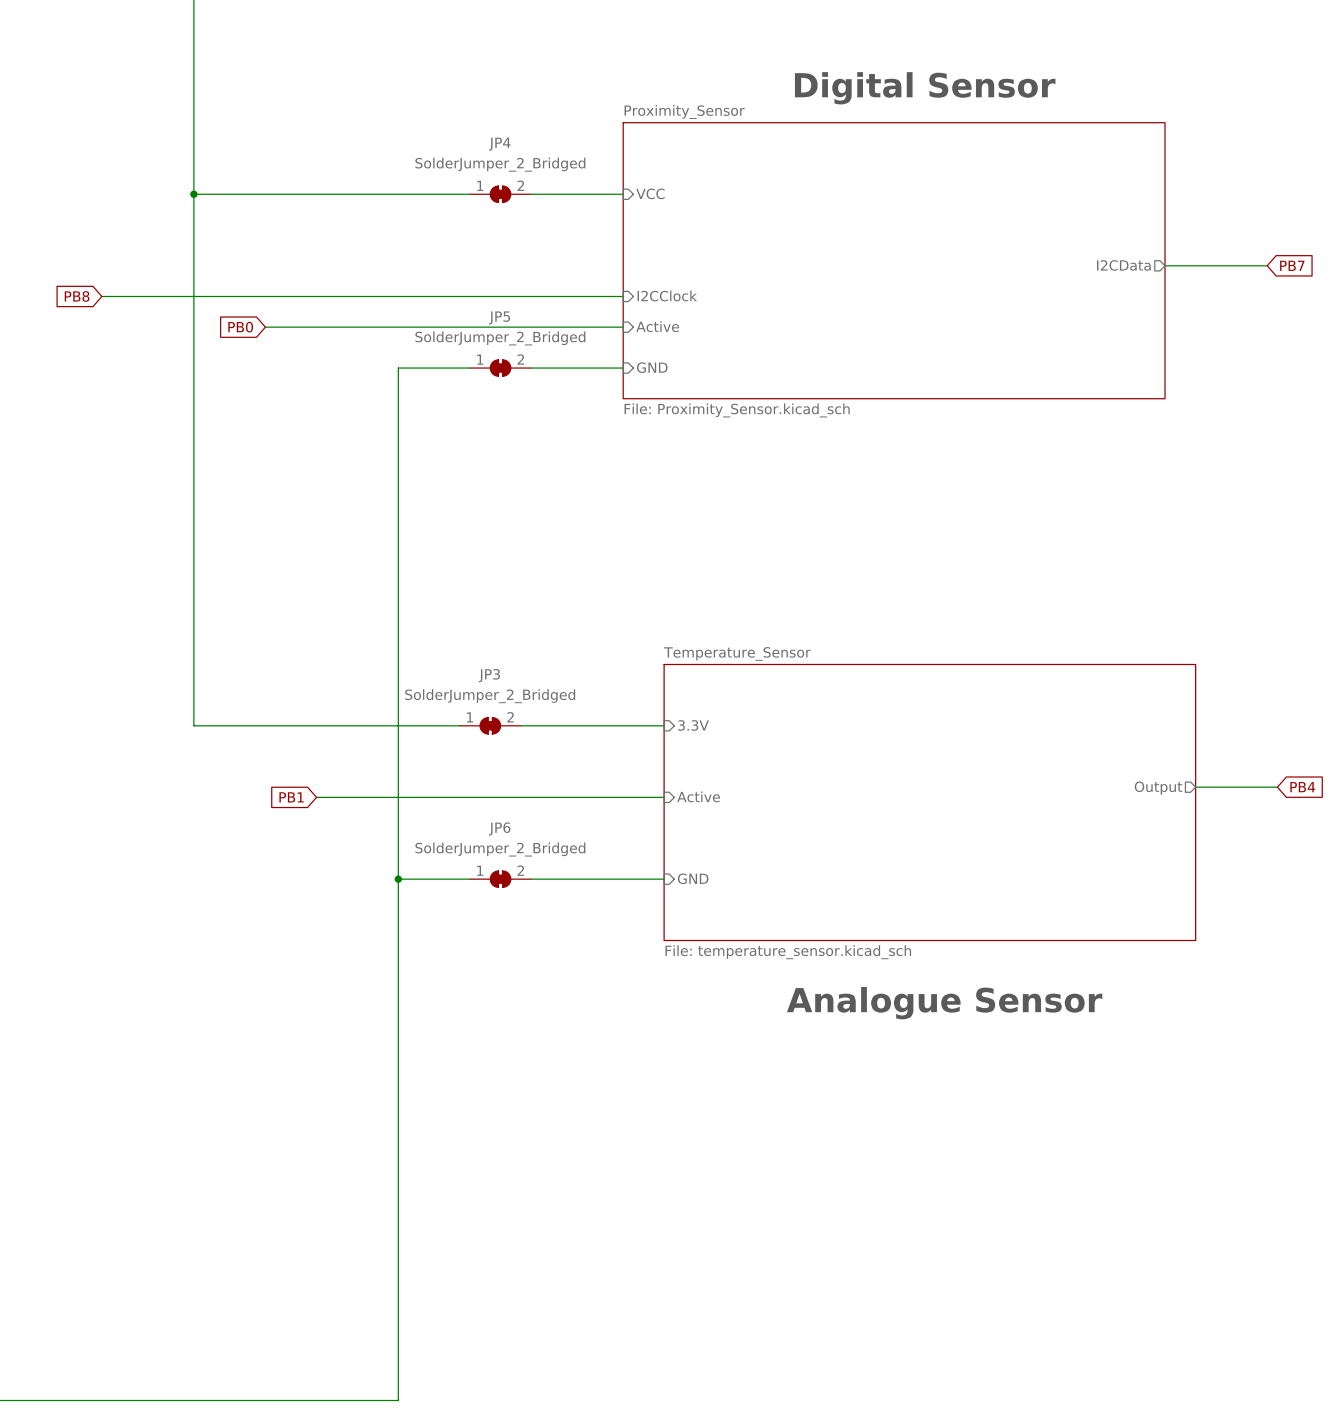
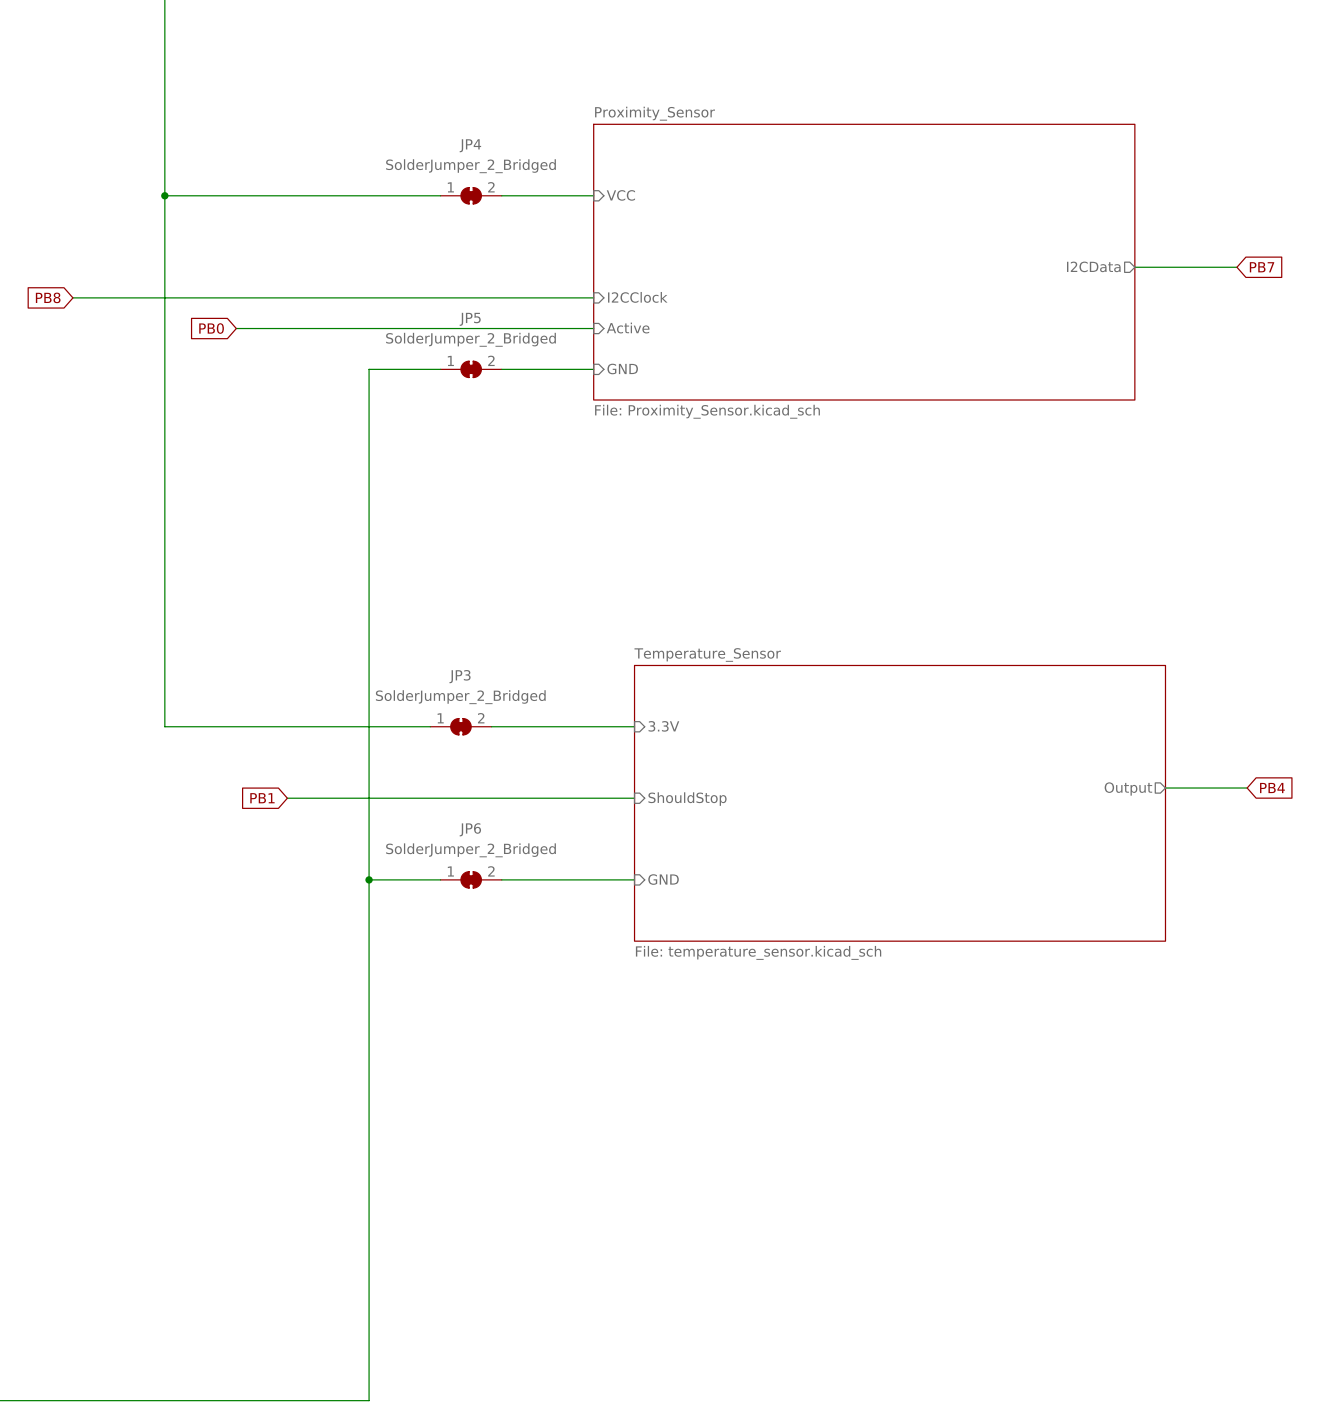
text: Digital Sensor (925, 88) -> none
sheet pin: Active (698, 796) -> ShouldStop (687, 799)
text: Analogue Sensor (944, 1003) -> none

